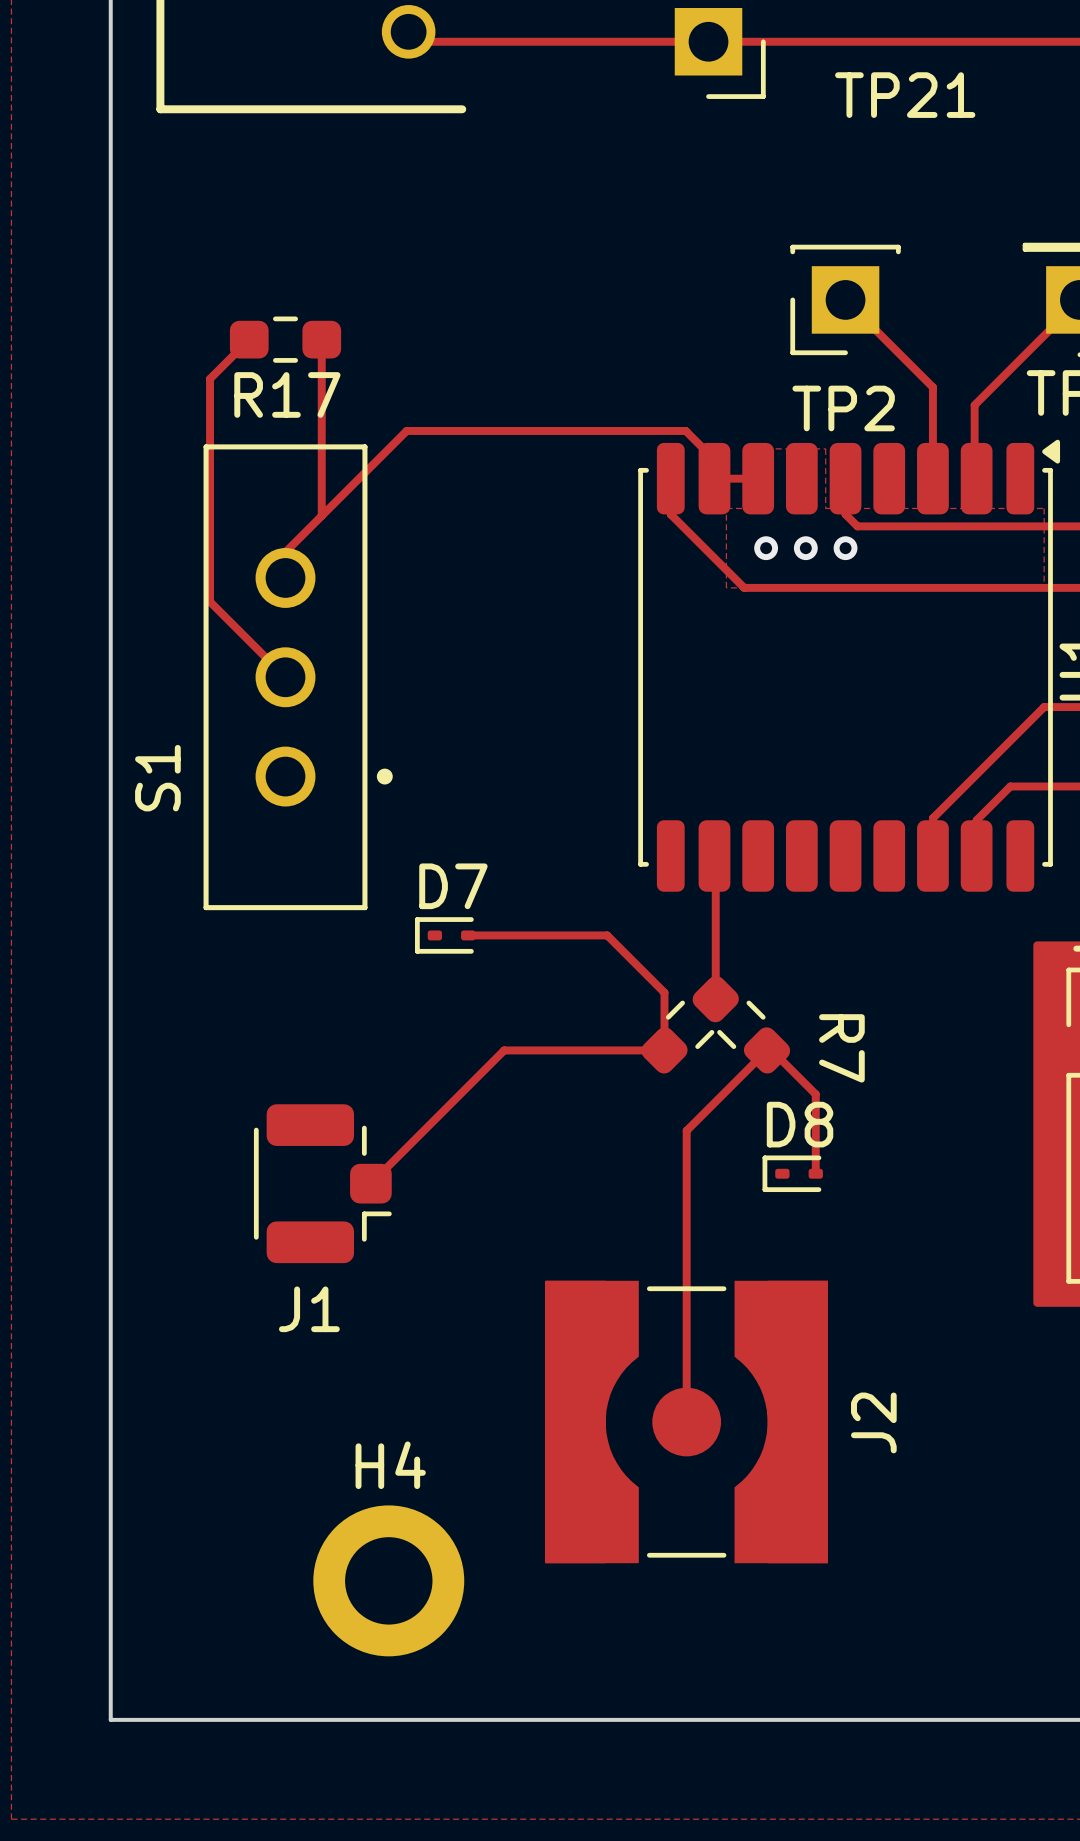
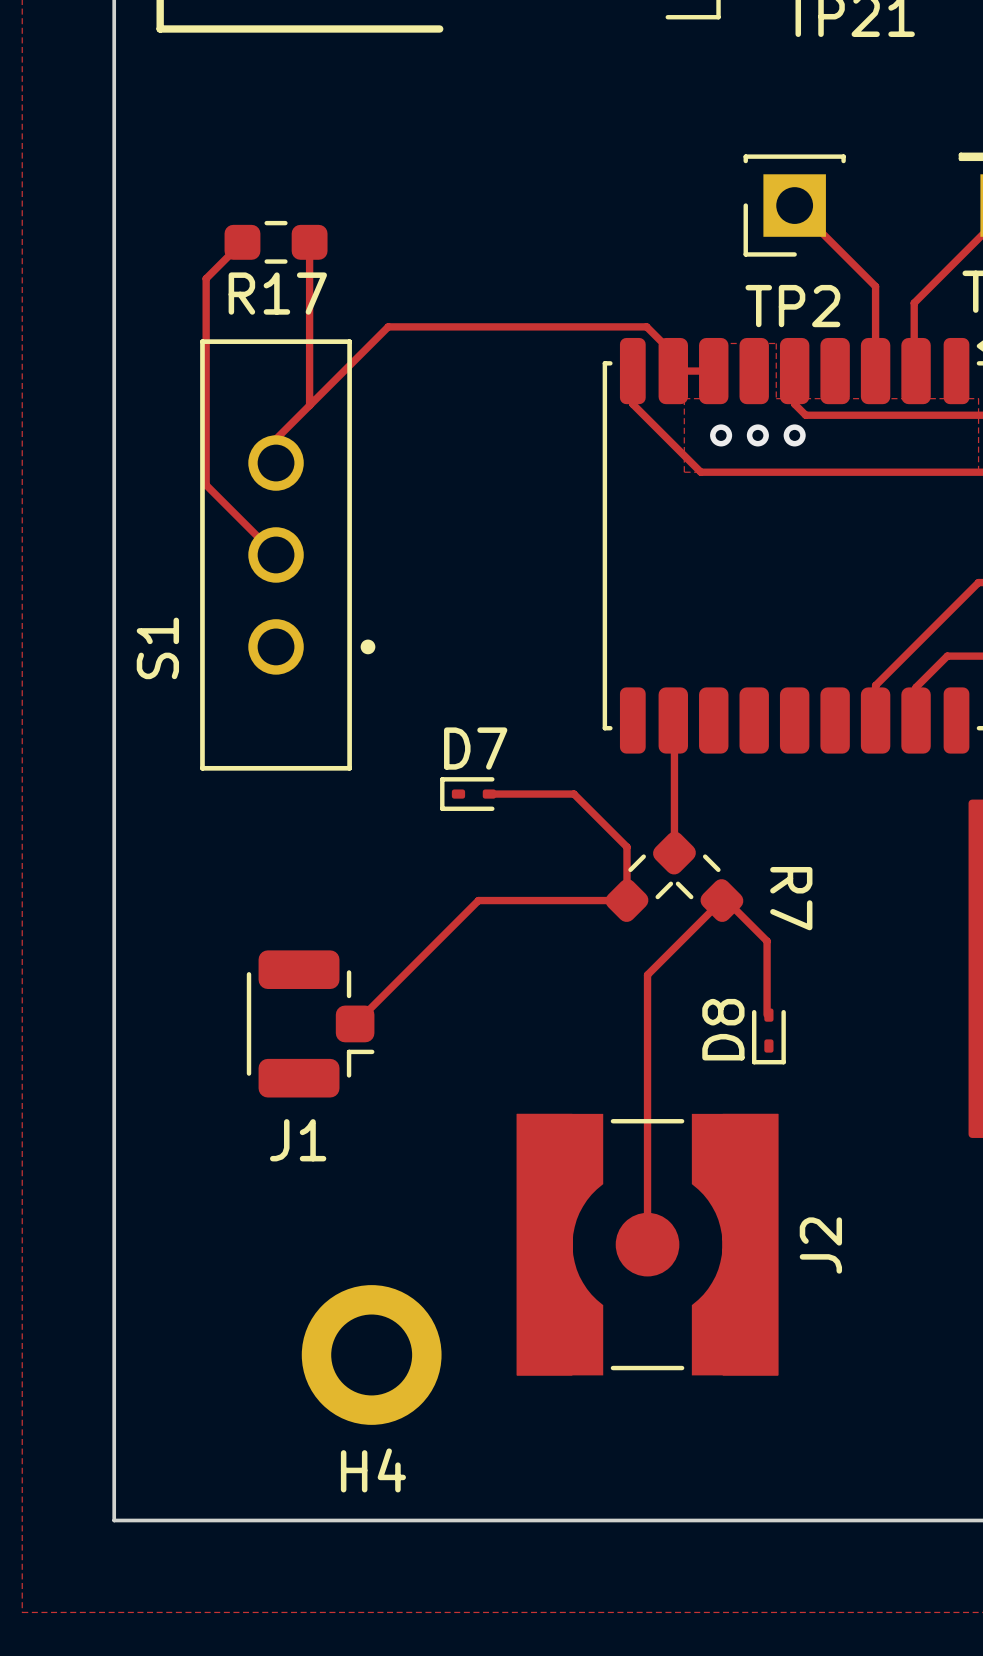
D7 position: (445, 935) -> (468, 794)
track: (468, 935) (515, 935) -> none
D8 rotation: 0° (792, 1173) -> 90° counterclockwise (768, 1036)
H4 name position: H4 (390, 1465) -> H4 (373, 1470)
H4 position: (388, 1580) -> (371, 1354)

